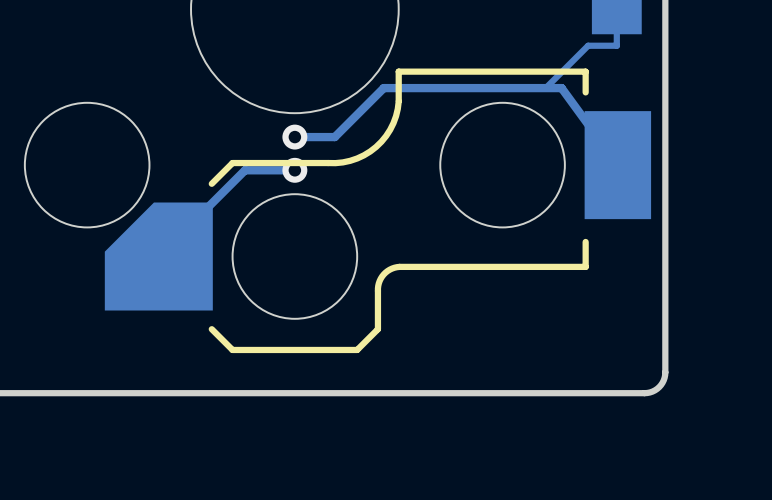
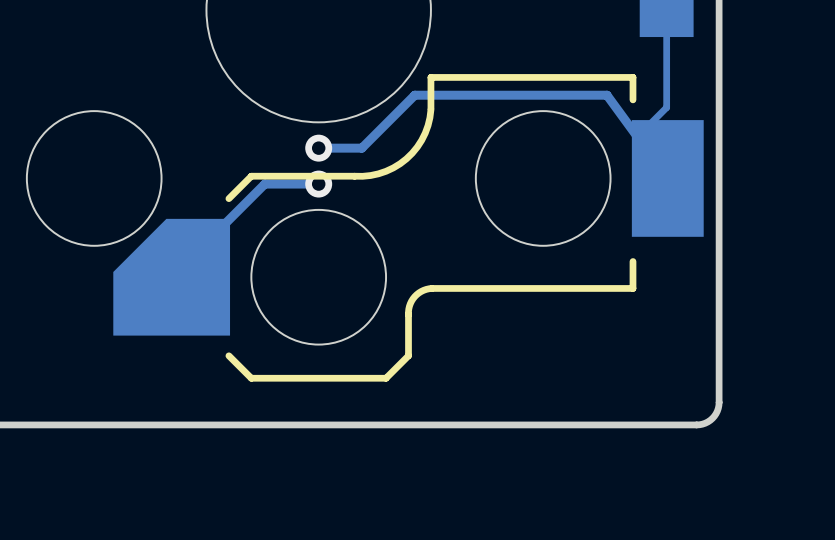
track: (616, 45) (588, 45) (545, 88) -> (666, 49) (666, 107) (637, 136)

